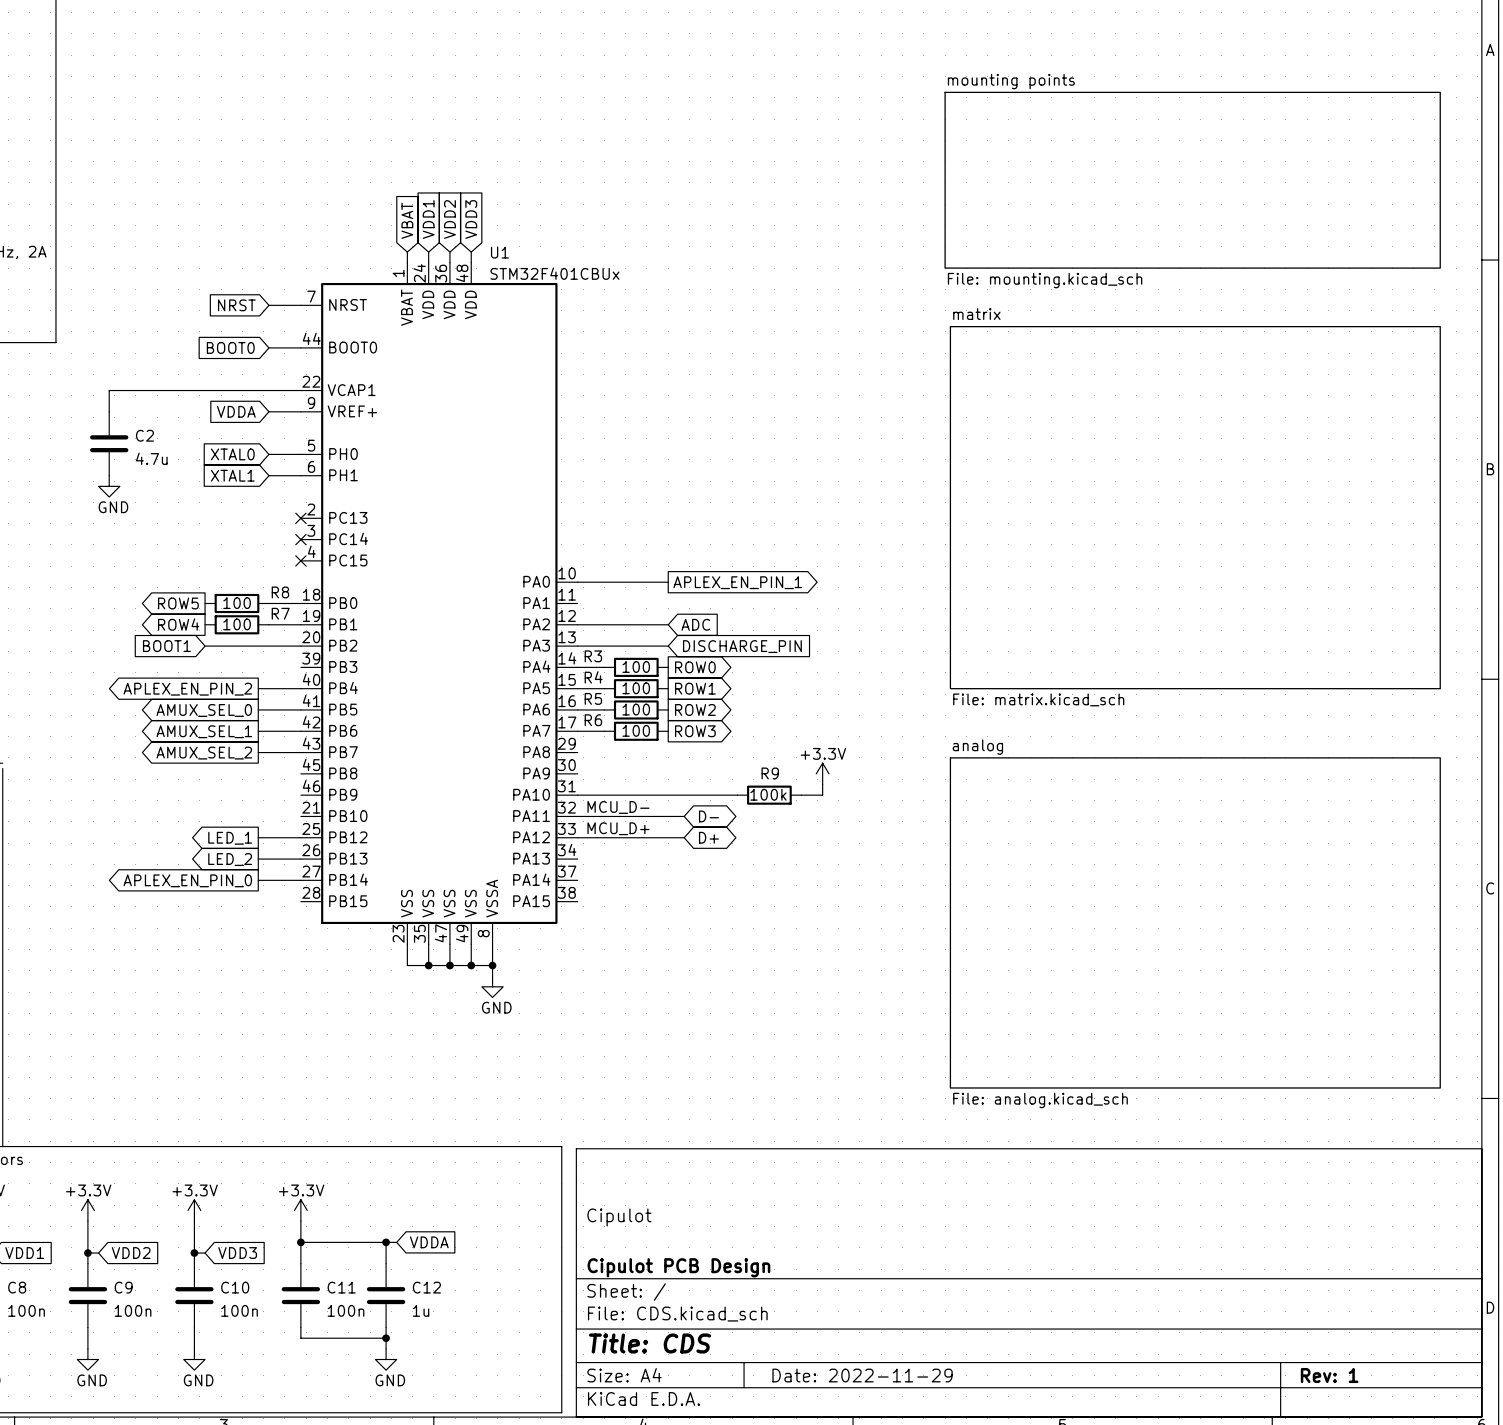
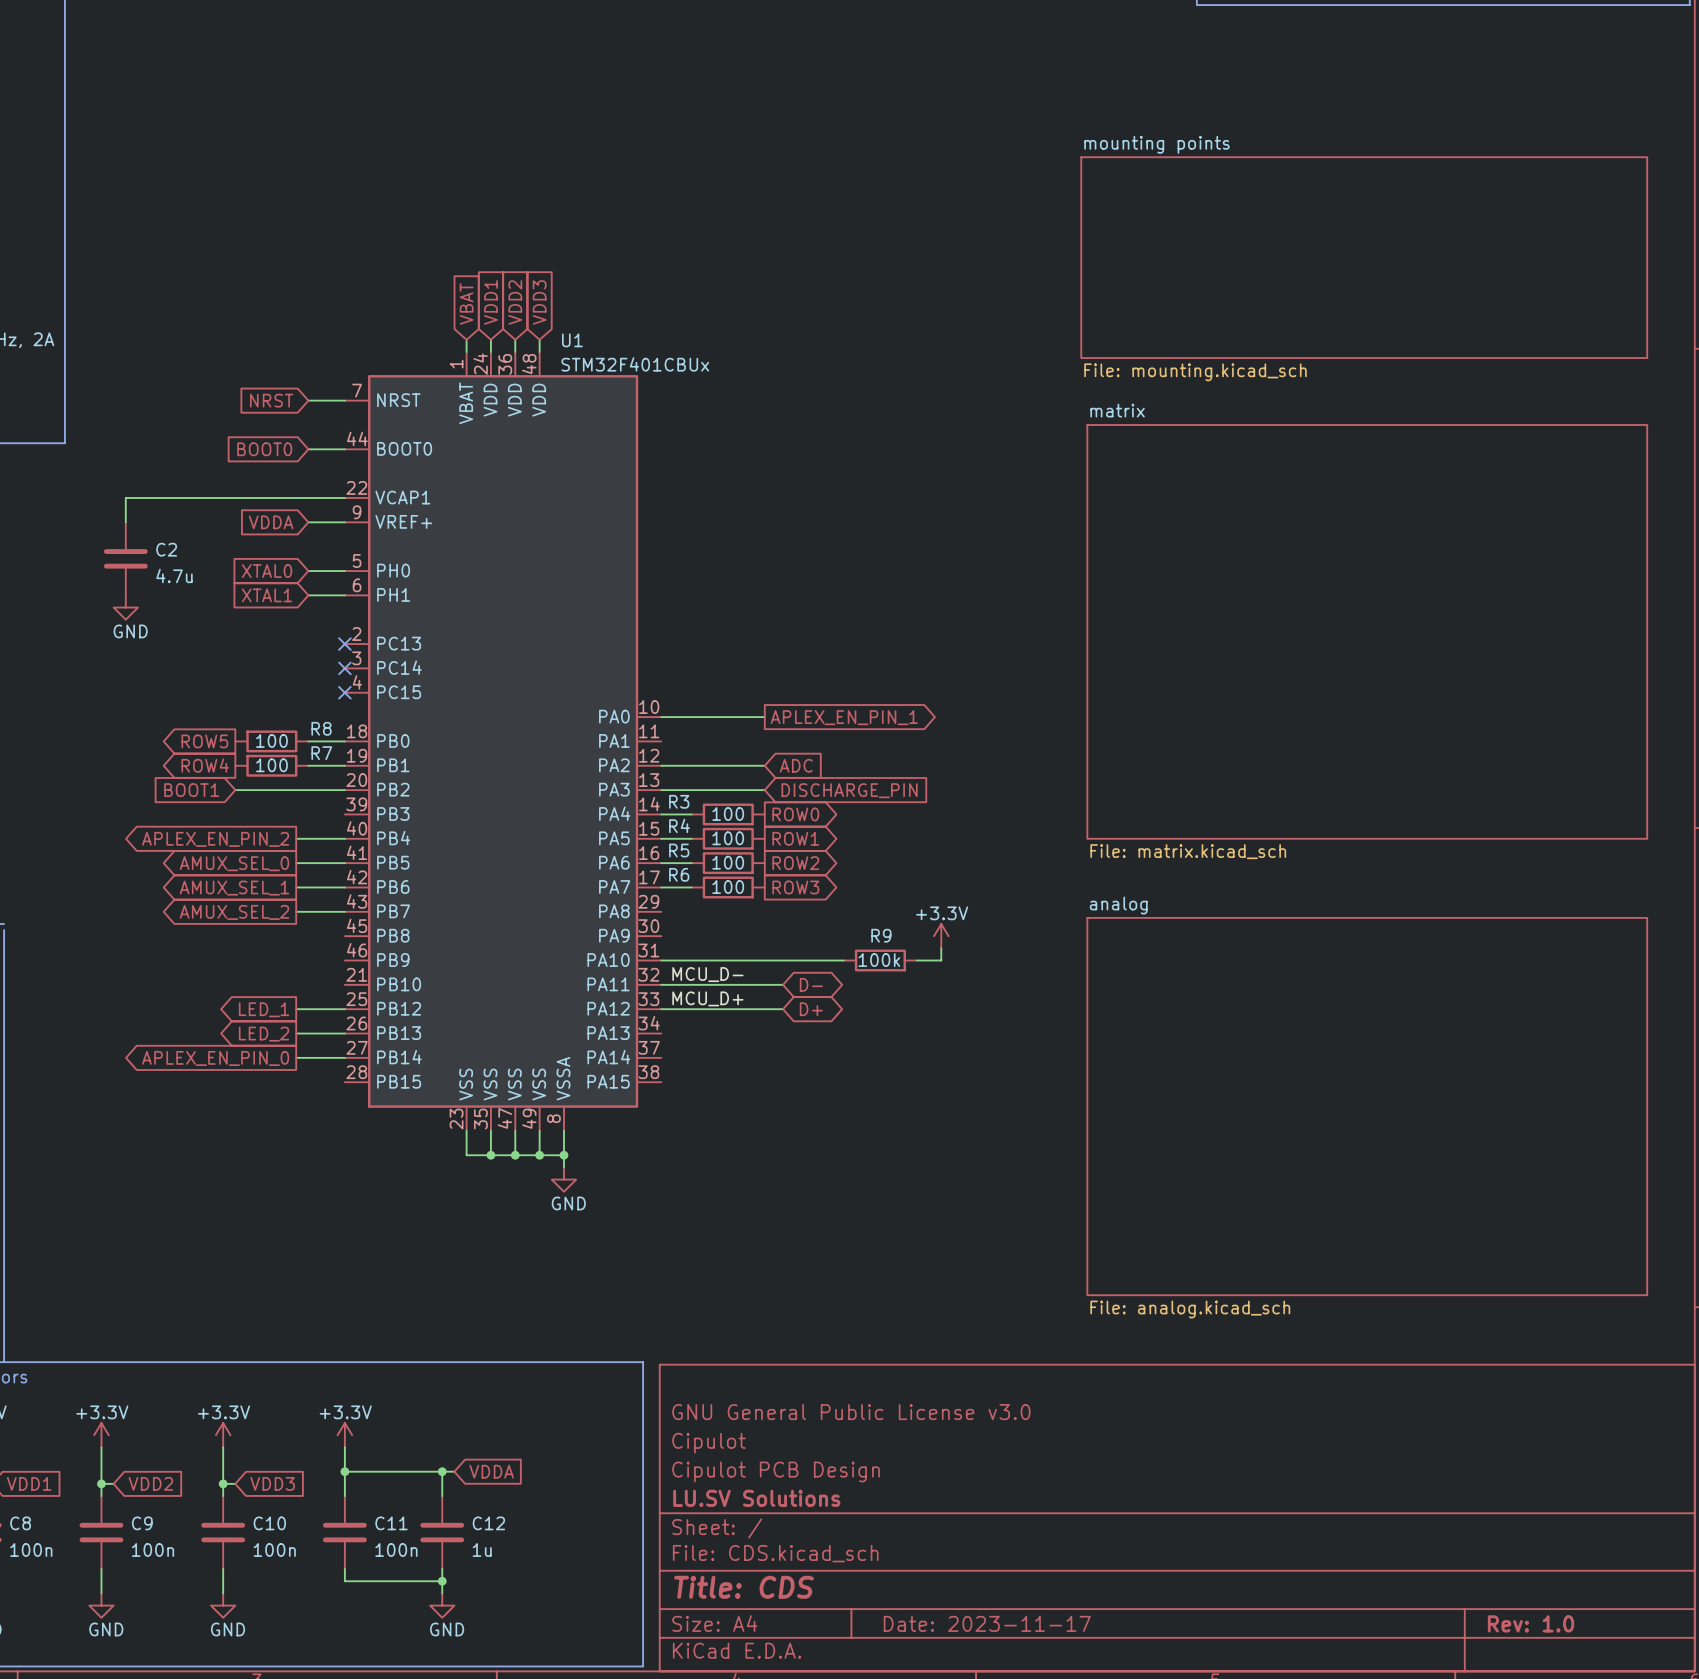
title block: none -> GNU General Public License v3.0 (851, 1412)
title block: none -> Cipulot PCB Design (776, 1471)
title block: Cipulot PCB Design (678, 1267) -> LU.SV Solutions (756, 1498)
title block: Date: 2022-11-29 (862, 1375) -> Date: 2023-11-17 (987, 1623)
title block: Rev: 1 (1329, 1375) -> Rev: 1.0 (1531, 1623)

